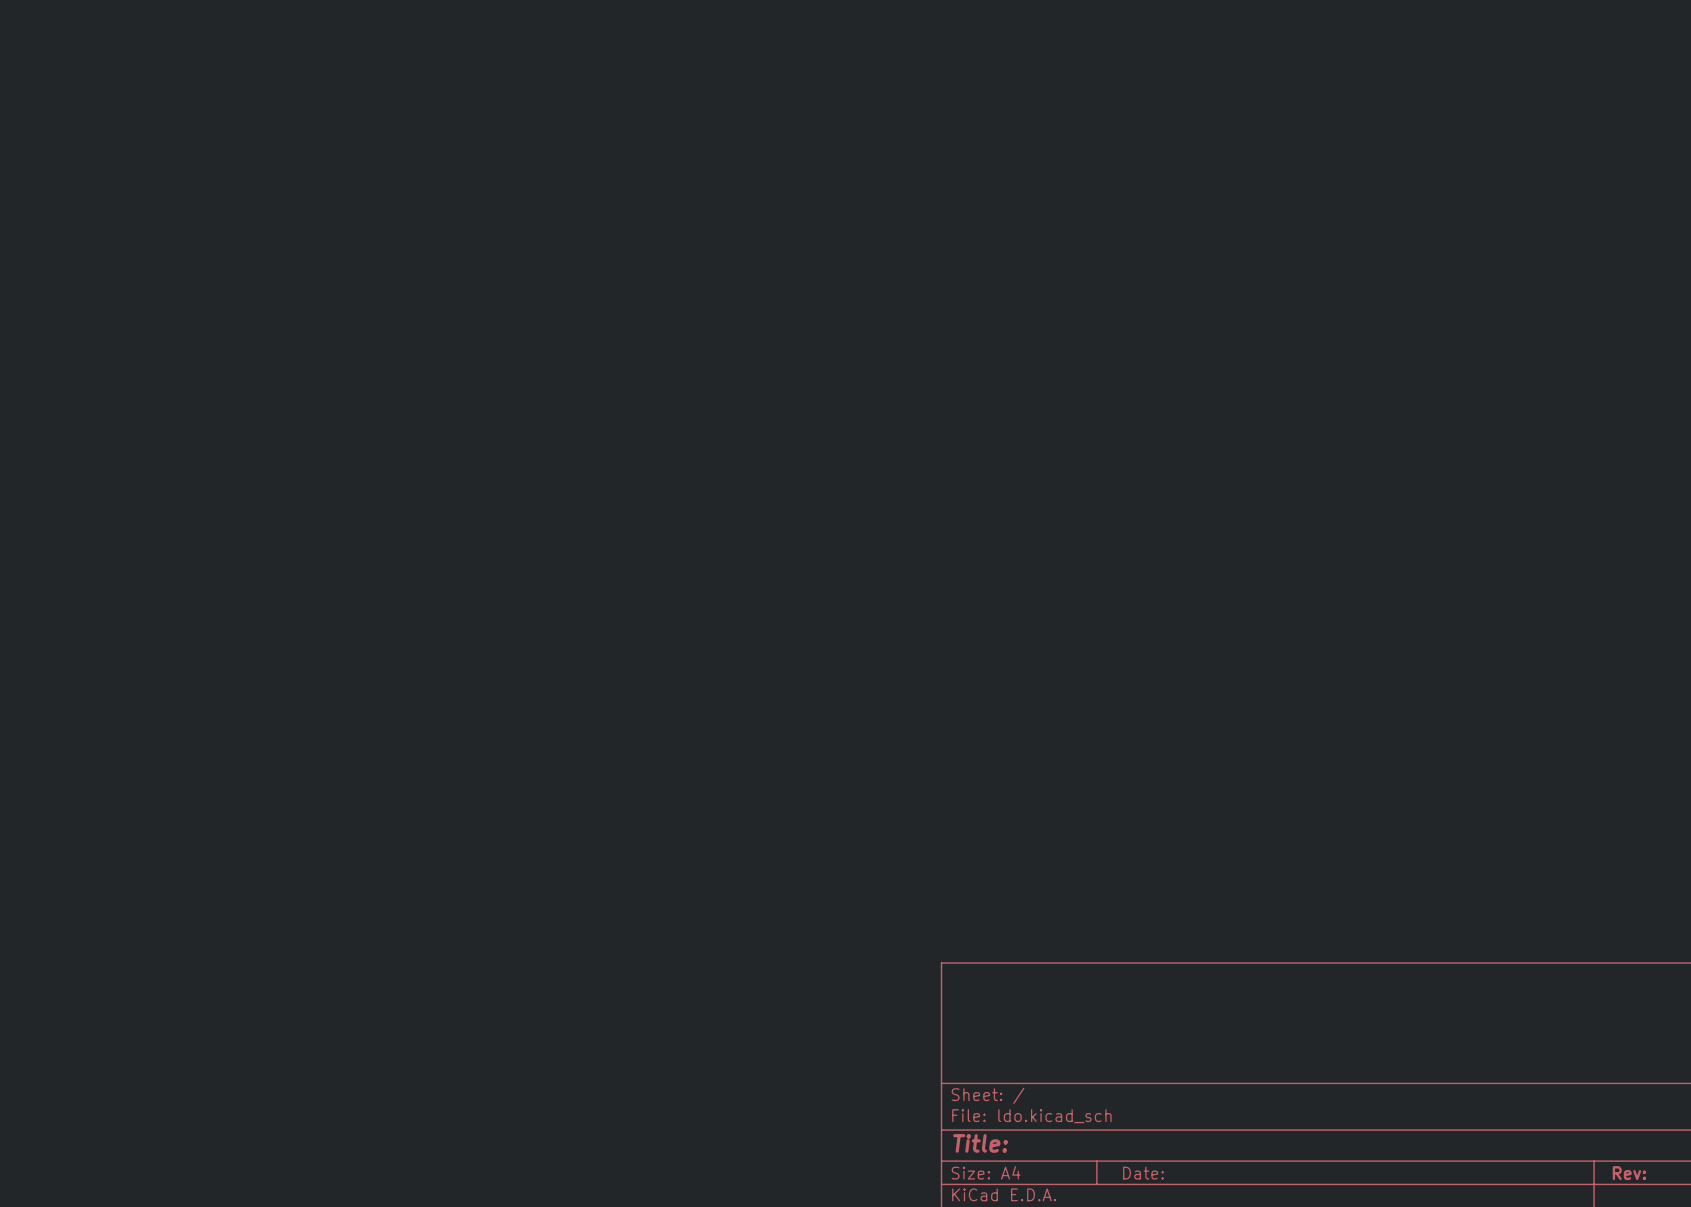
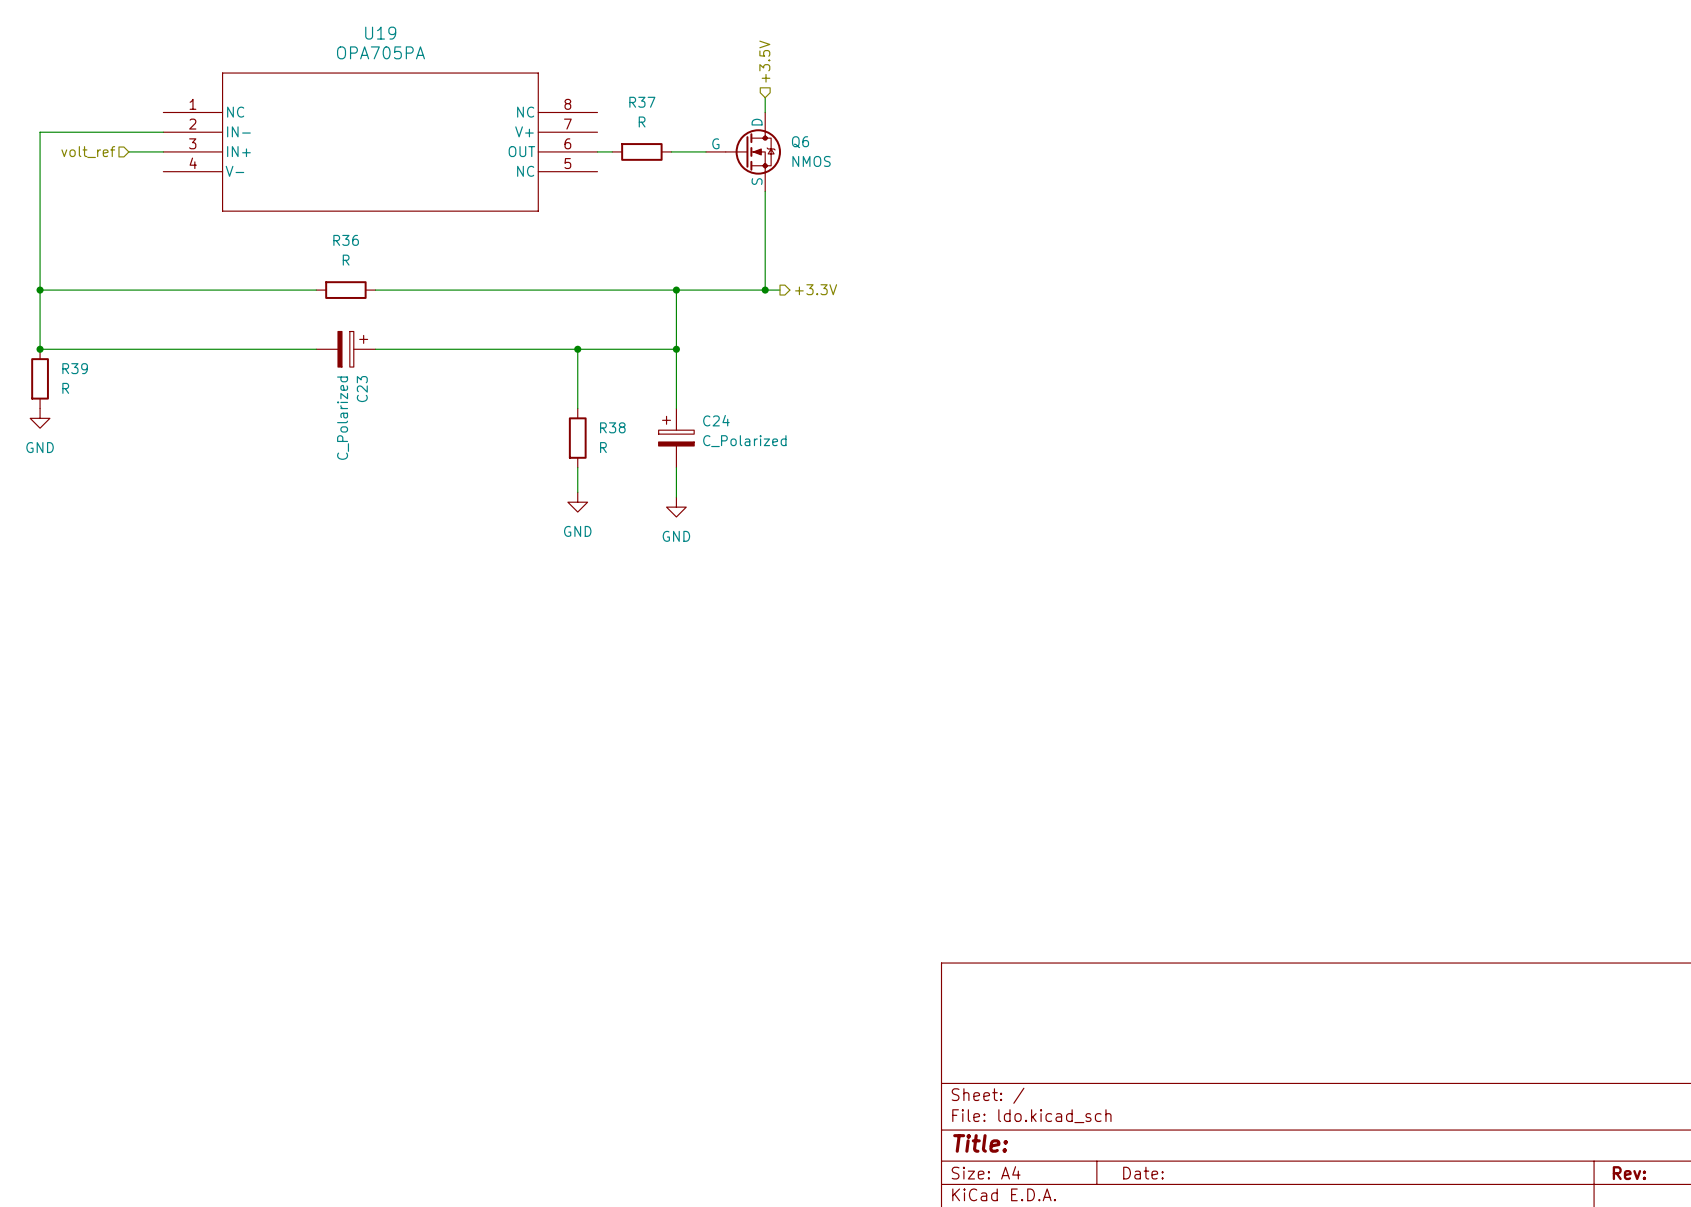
hierarchical label: none -> +3.5V (764, 61)
wire: none -> (765, 97) (765, 112)
wire: none -> (163, 132) (40, 132) (40, 349) (316, 349)
U19: none -> OPA705PA (380, 142)
wire: none -> (128, 151) (163, 151)
wire: none -> (597, 151) (612, 151)
R37: none -> R (641, 151)
wire: none -> (671, 151) (706, 151)
Q6: none -> NMOS (743, 151)
hierarchical label: none -> volt_ref (88, 152)
wire: none -> (765, 191) (765, 290)
hierarchical label: none -> +3.3V (816, 289)
wire: none -> (40, 290) (316, 290)
junction: none -> (40, 290)
R36: none -> R (345, 290)
wire: none -> (375, 290) (780, 290)
wire: none -> (676, 290) (676, 408)
junction: none -> (676, 290)
junction: none -> (765, 290)
junction: none -> (40, 349)
C23: none -> C_Polarized (345, 349)
wire: none -> (375, 349) (676, 349)
wire: none -> (577, 349) (577, 408)
junction: none -> (577, 349)
junction: none -> (676, 349)
R39: none -> R (40, 378)
power symbol: none -> GND (40, 418)
R38: none -> R (577, 438)
C24: none -> C_Polarized (676, 438)
wire: none -> (577, 467) (577, 492)
wire: none -> (676, 467) (676, 497)
power symbol: none -> GND (577, 502)
power symbol: none -> GND (676, 507)

